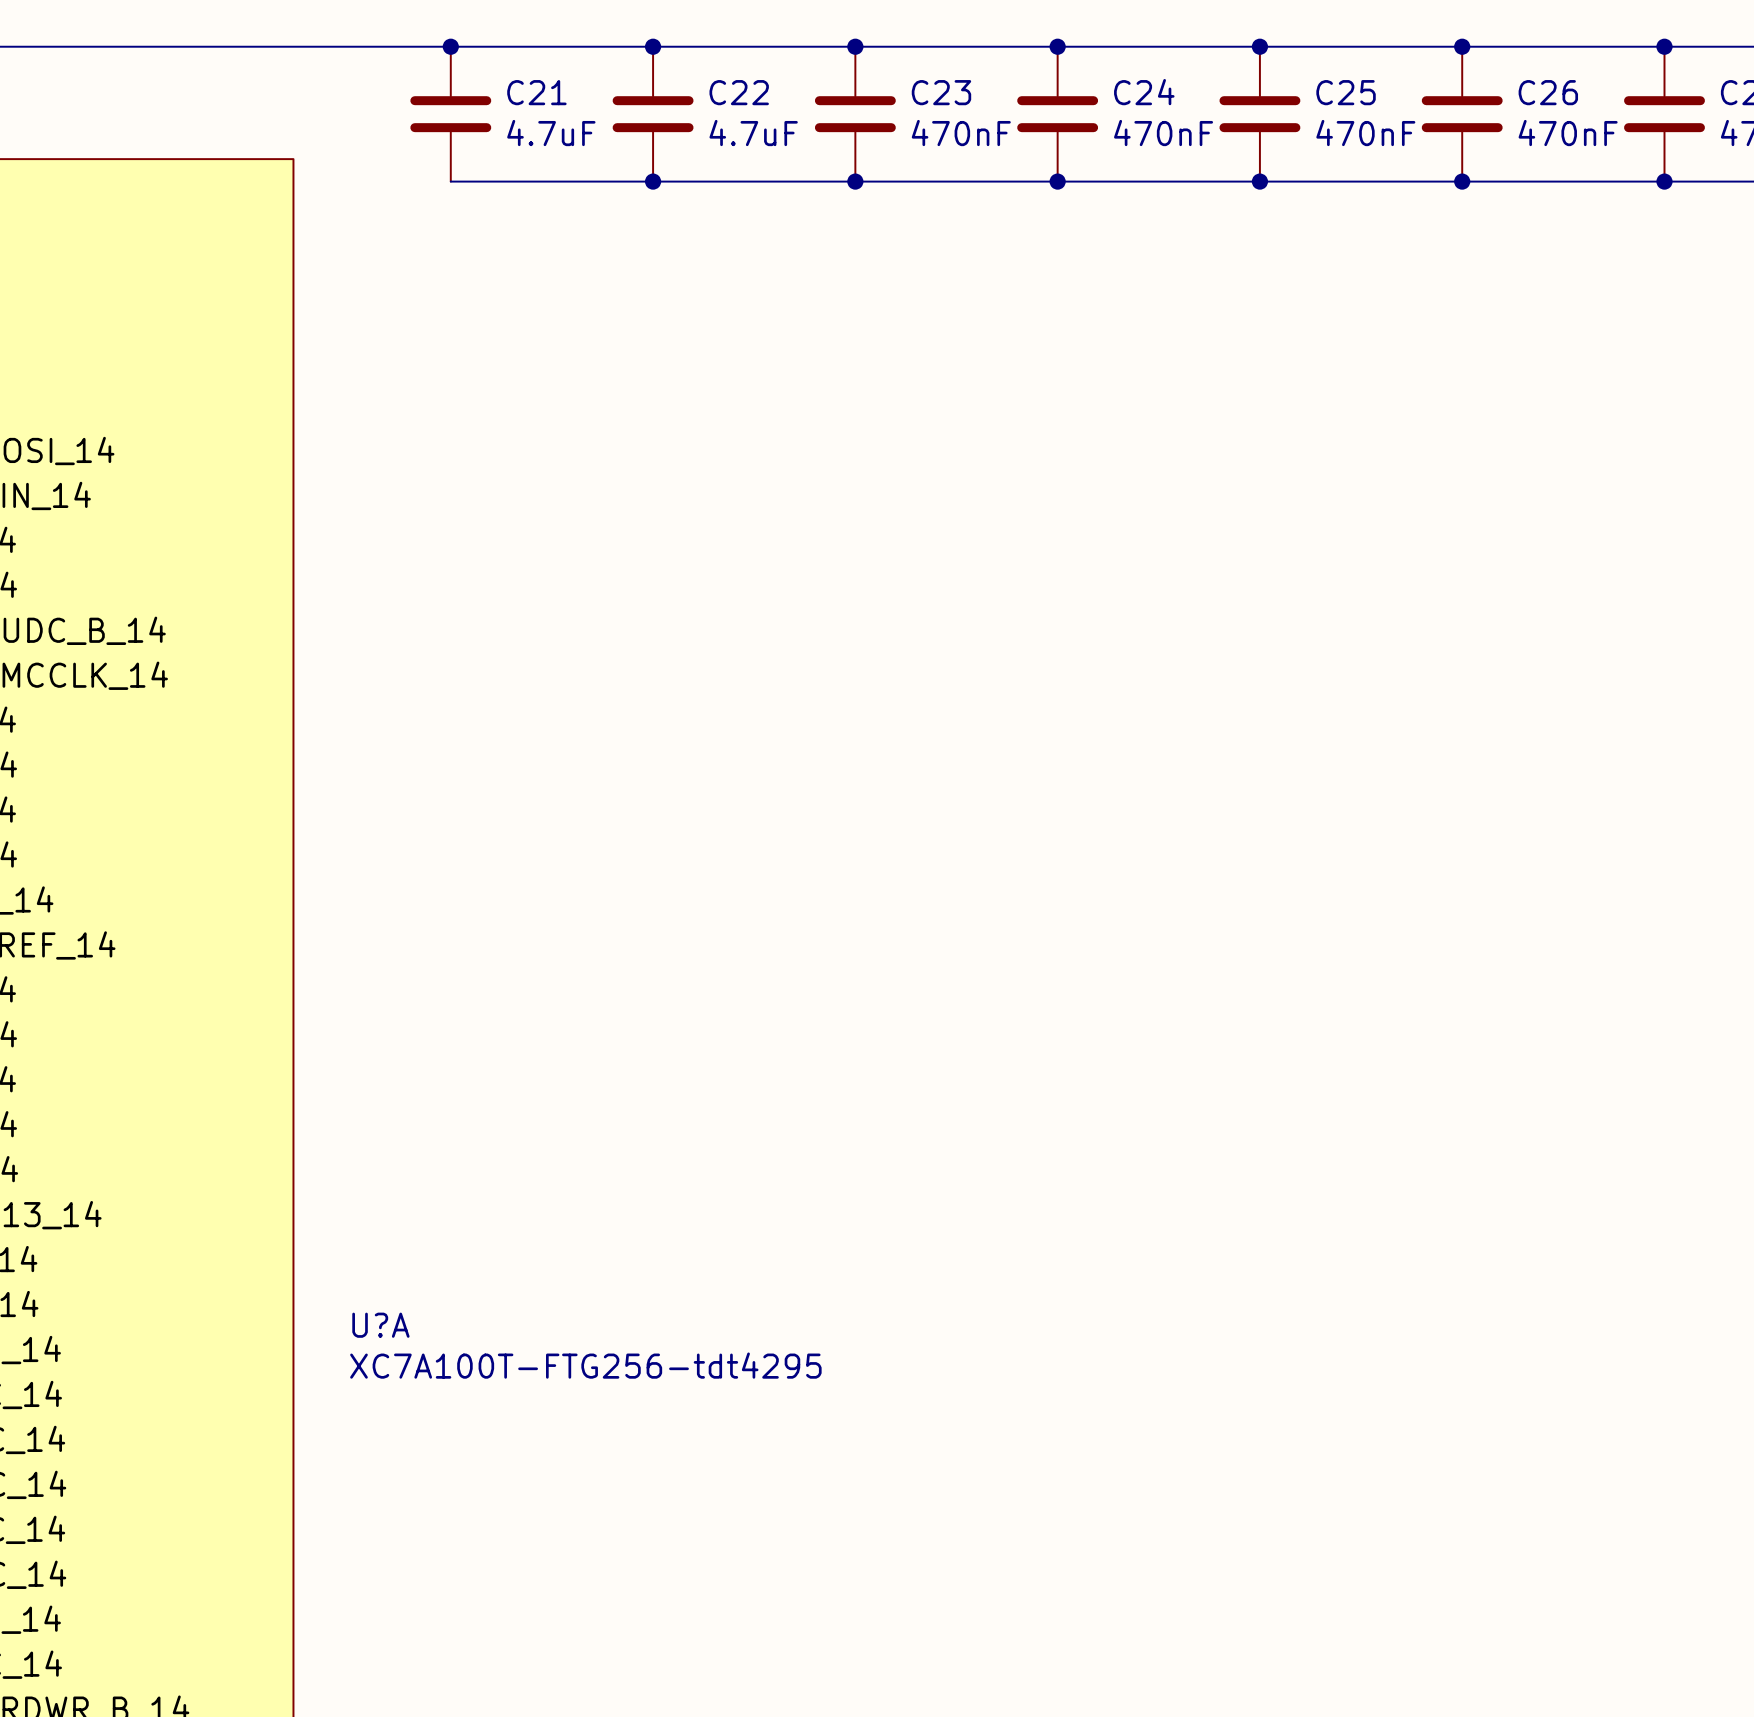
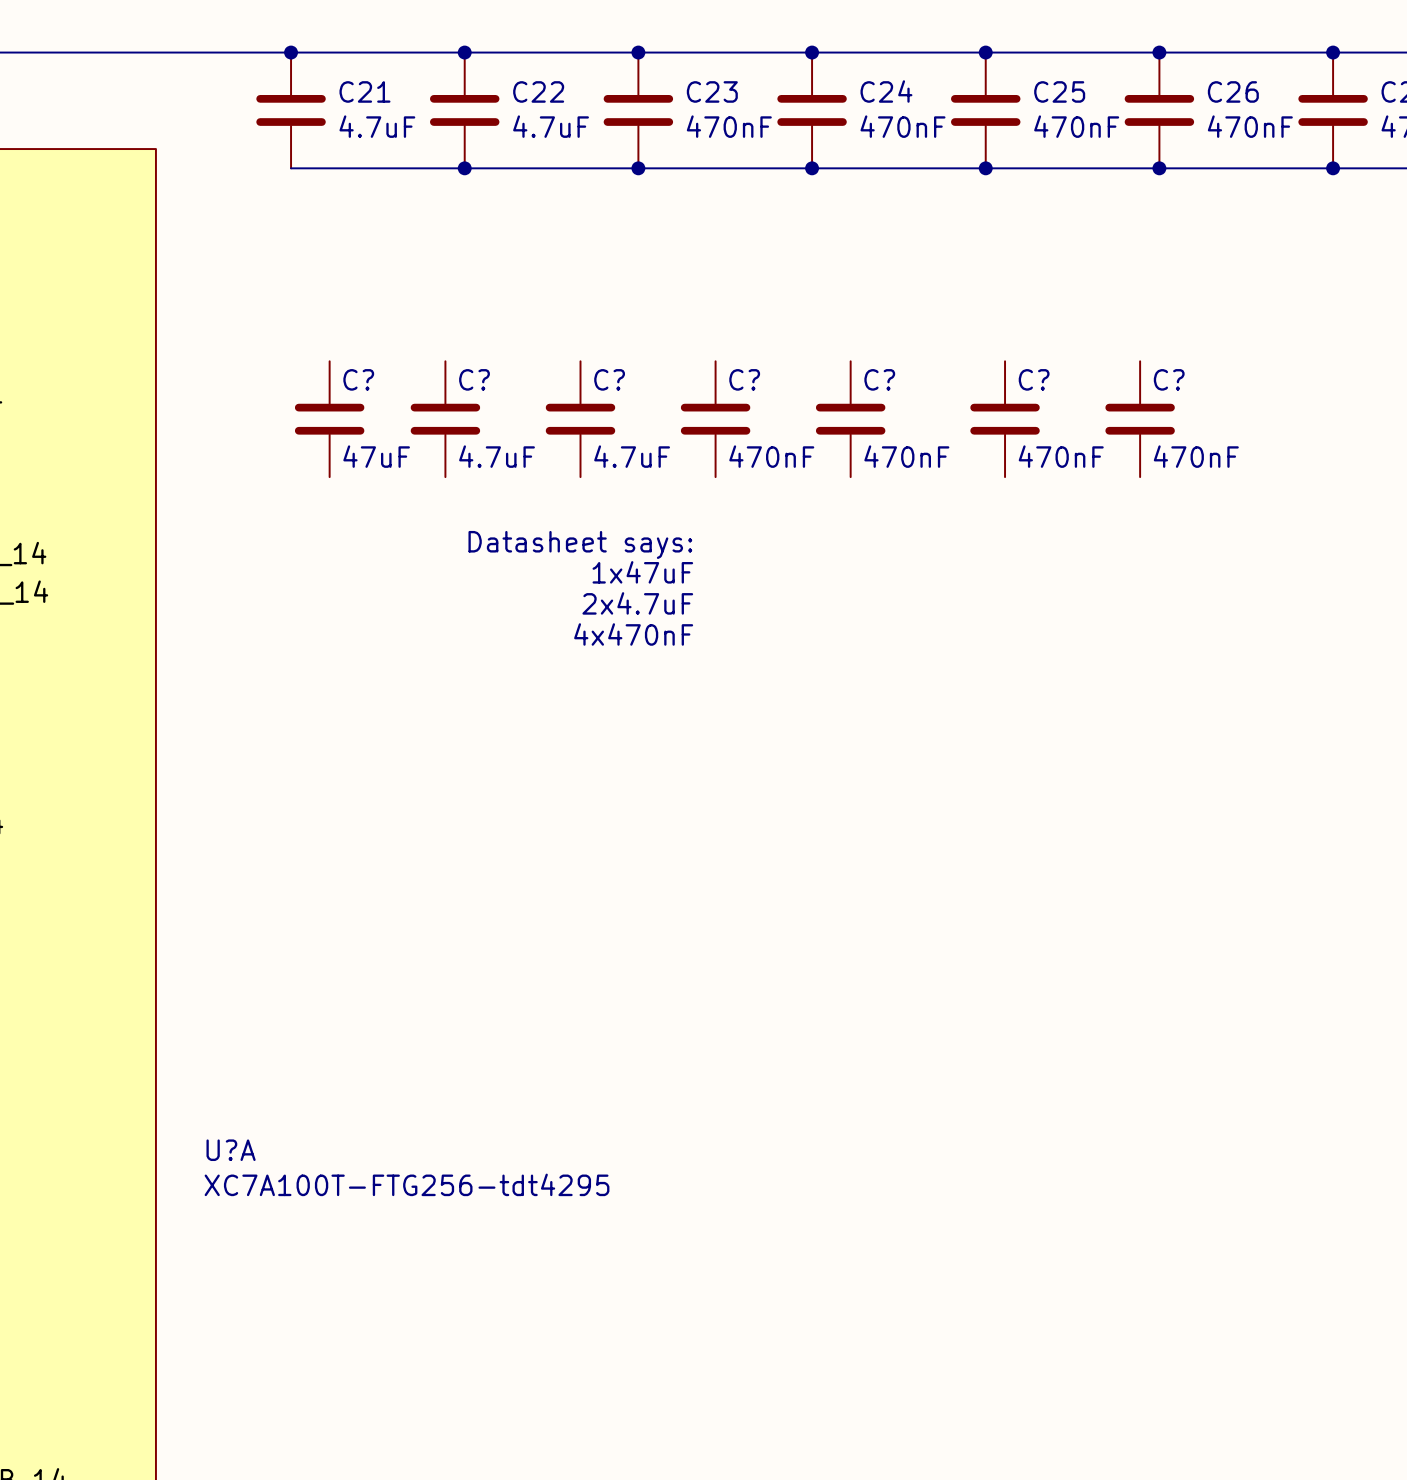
C?: none -> 47uF (329, 419)
C?: none -> 4.7uF (445, 419)
C?: none -> 4.7uF (580, 419)
C?: none -> 470nF (715, 419)
C?: none -> 470nF (850, 419)
C?: none -> 470nF (1005, 419)
C?: none -> 470nF (1140, 419)
text: none -> Datasheet says: (580, 544)
text: none -> 1x47uF (642, 572)
text: none -> 2x4.7uF (637, 603)
text: none -> 4x470nF (633, 634)

